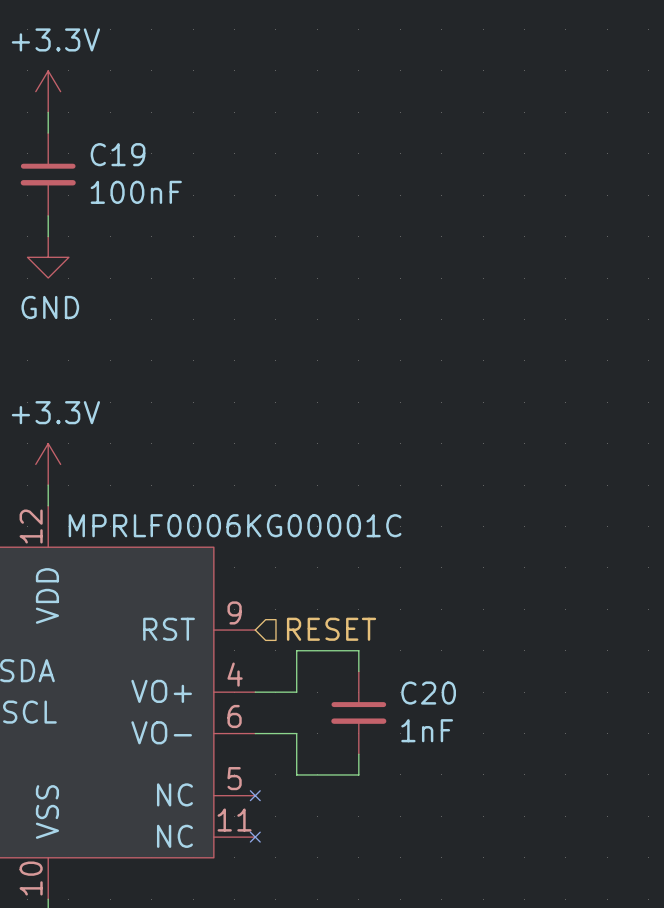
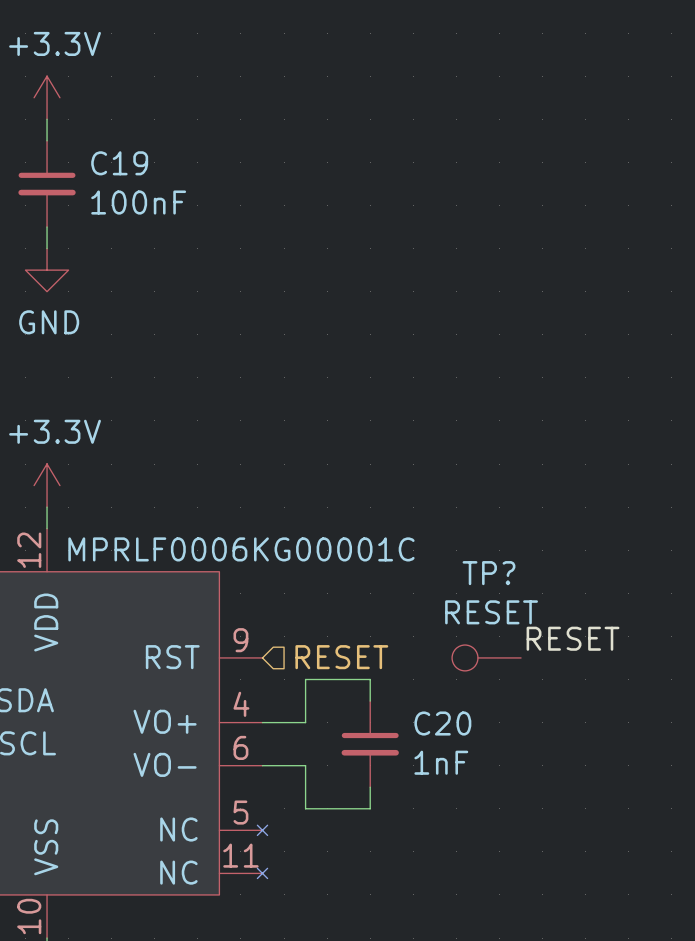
label: none -> RESET (573, 638)
TP?: none -> RESET (486, 657)

